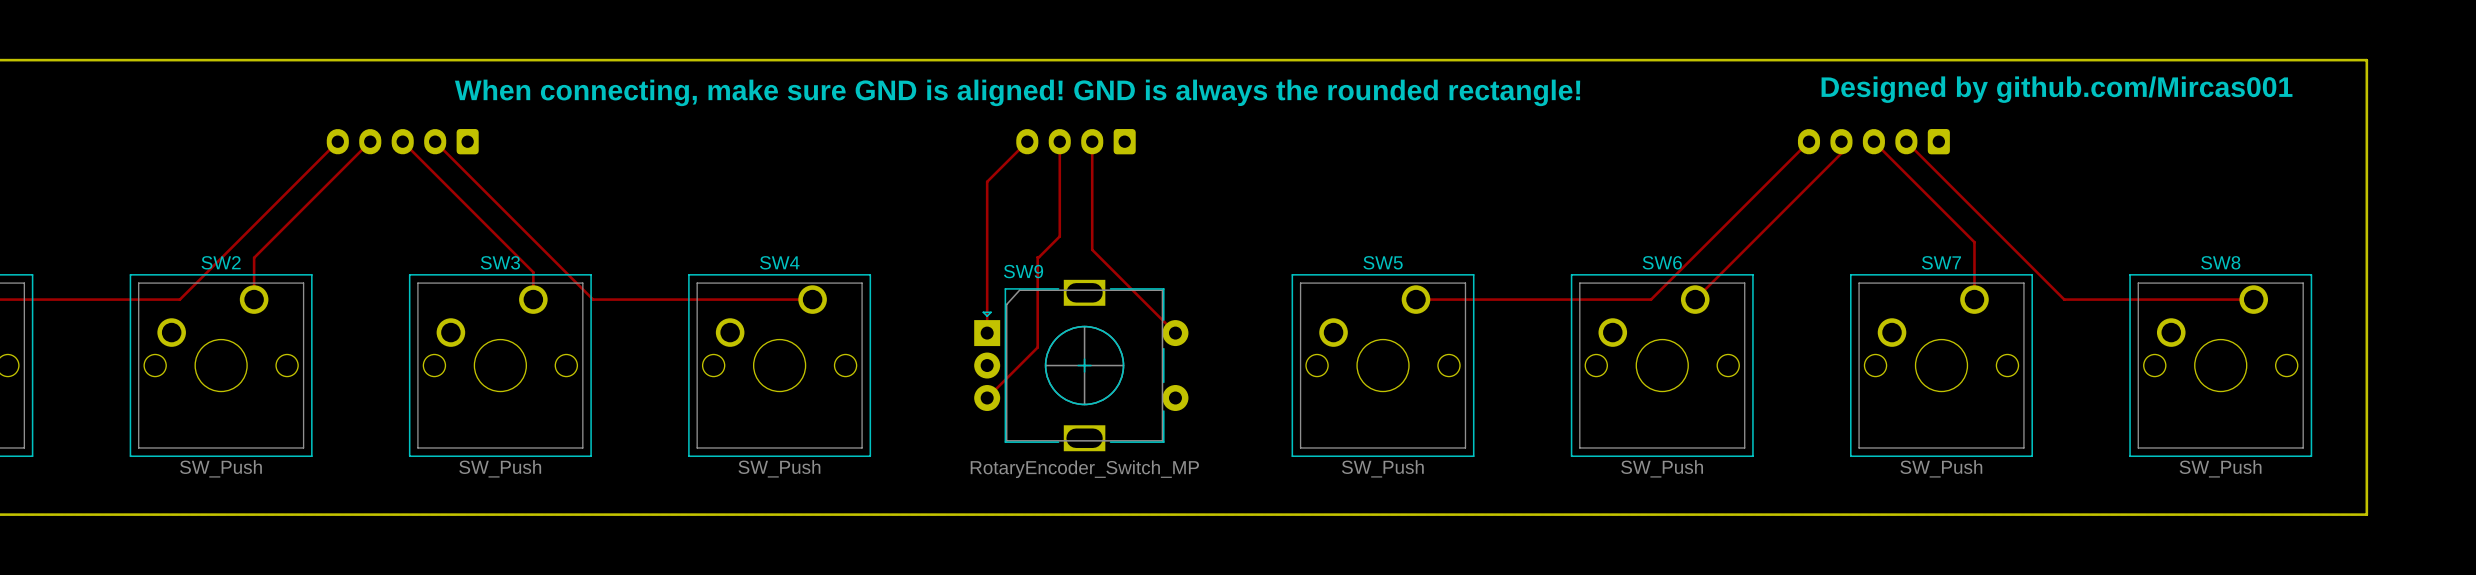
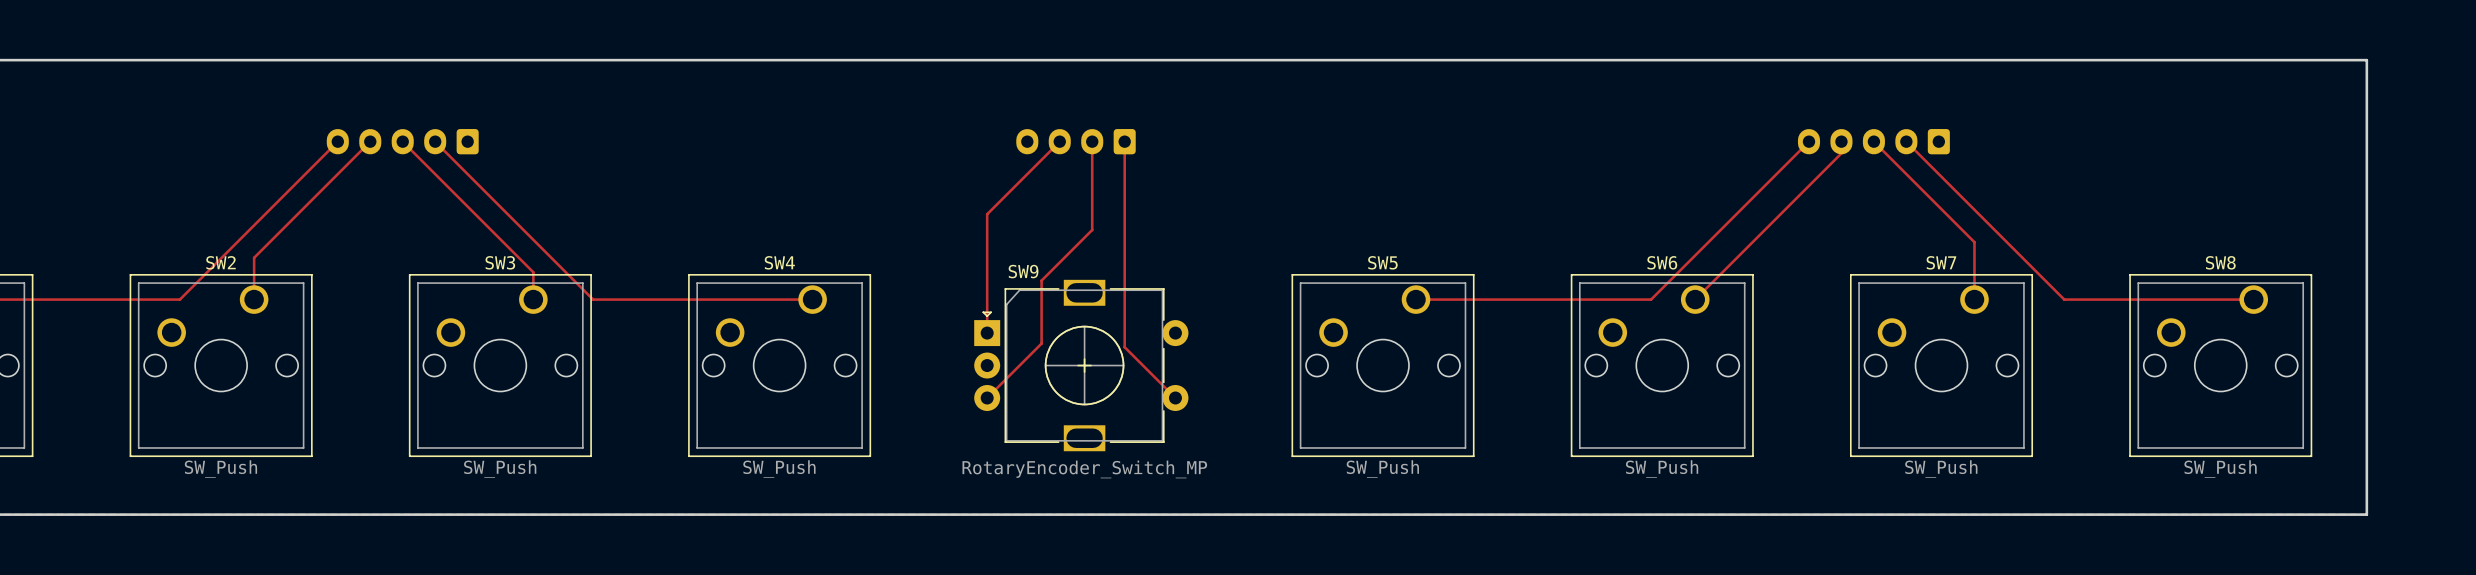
text: Designed by github.com/Mircas001 (2057, 89) -> none
text: When connecting, make sure GND is aligned! GND is always the rounded rectangle! (1017, 92) -> none
top track: (1027, 141) (987, 181) (987, 214) -> (1059, 141) (987, 214)
top track: (1059, 141) (1059, 236) (1037, 257) (1037, 347) -> (1092, 229) (1041, 280) (1041, 343) (1037, 347)
top track: none -> (1124, 141) (1124, 347) (1175, 397)
top track: (1092, 229) (1092, 249) (1175, 333) -> none

